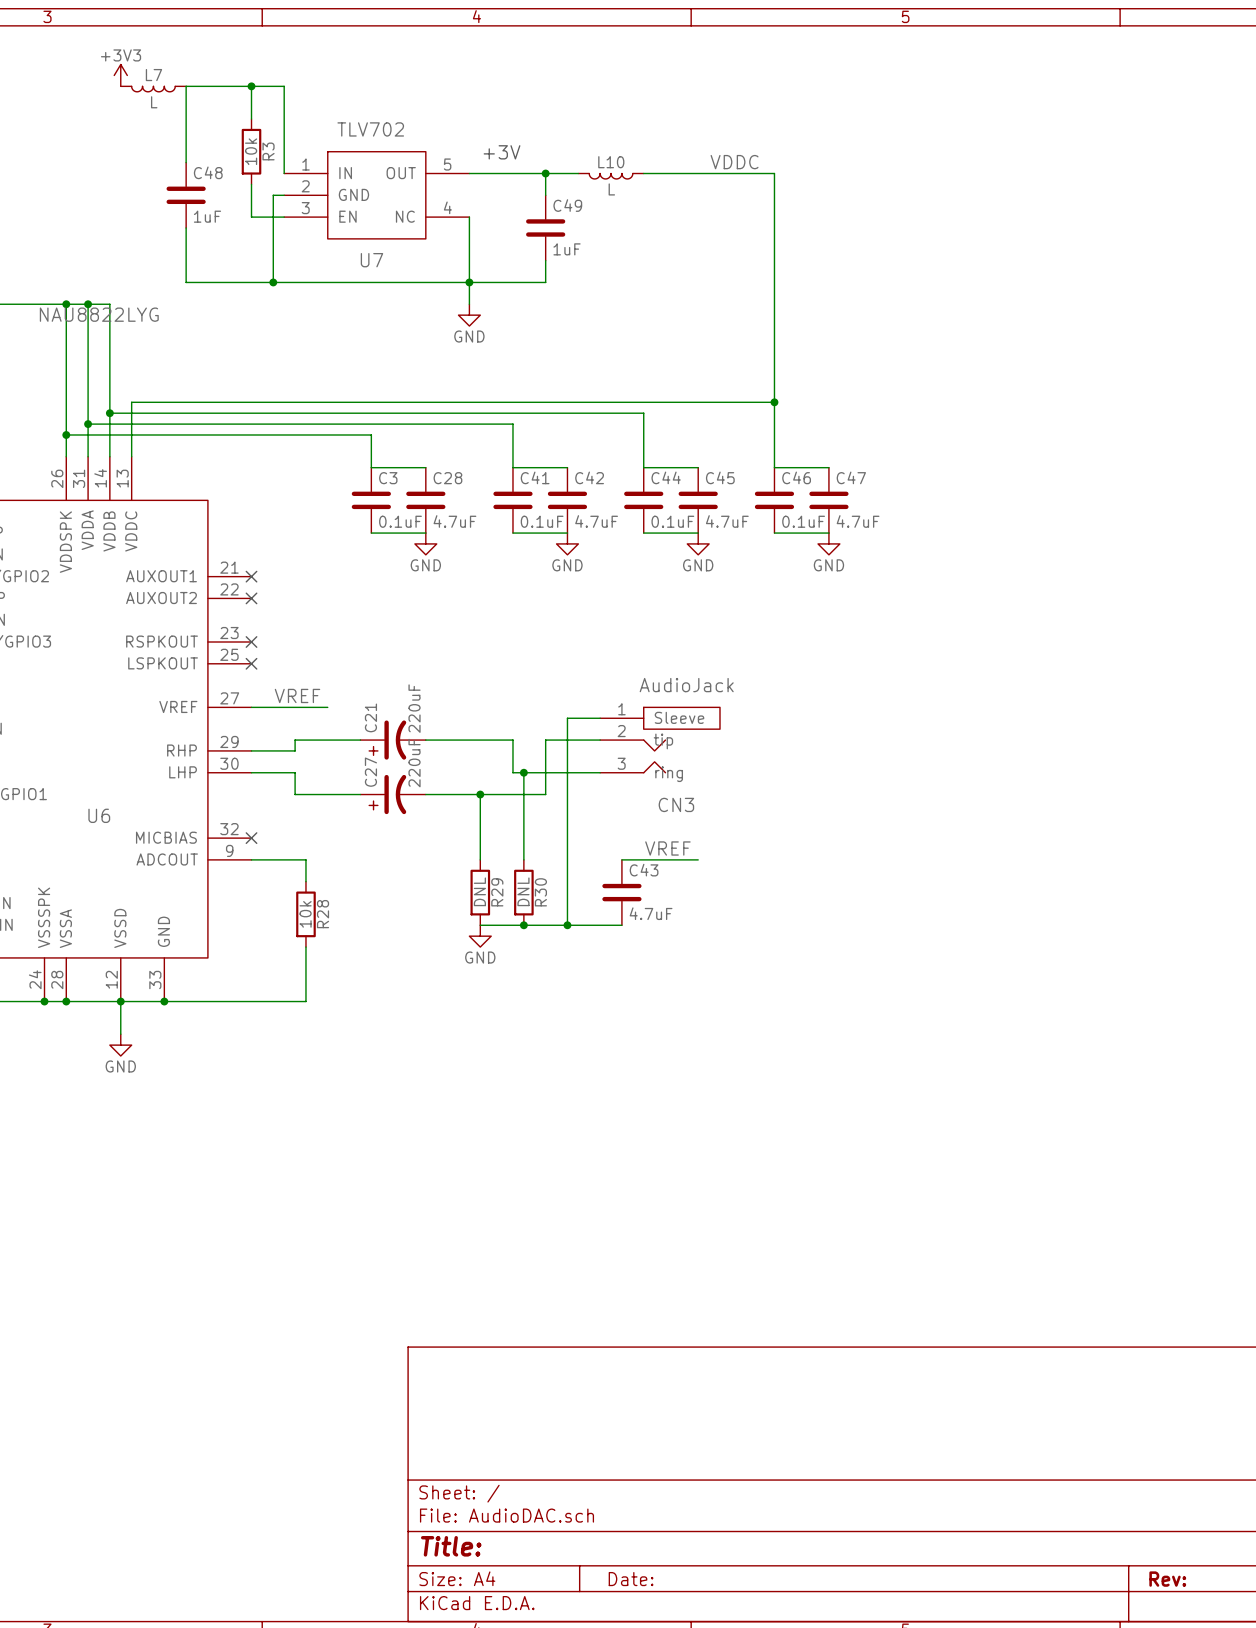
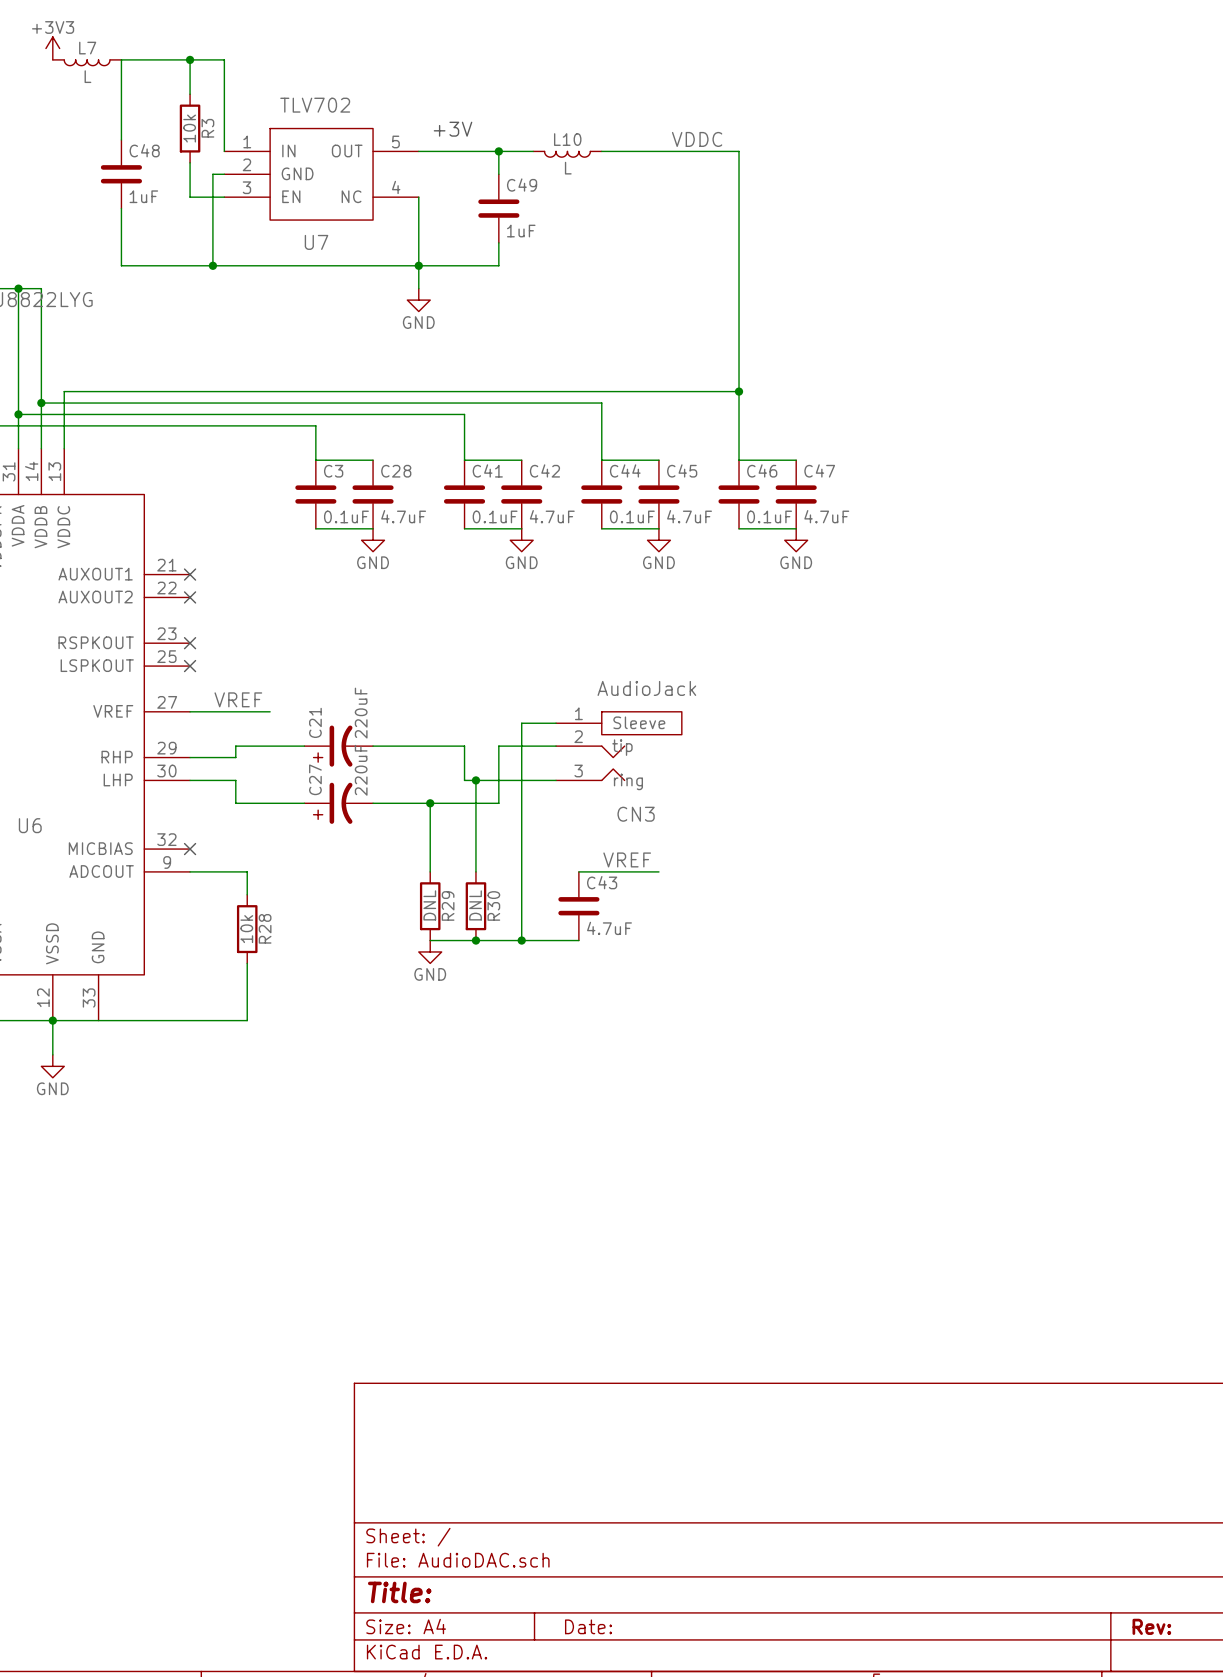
junction: (164, 1001) -> none

